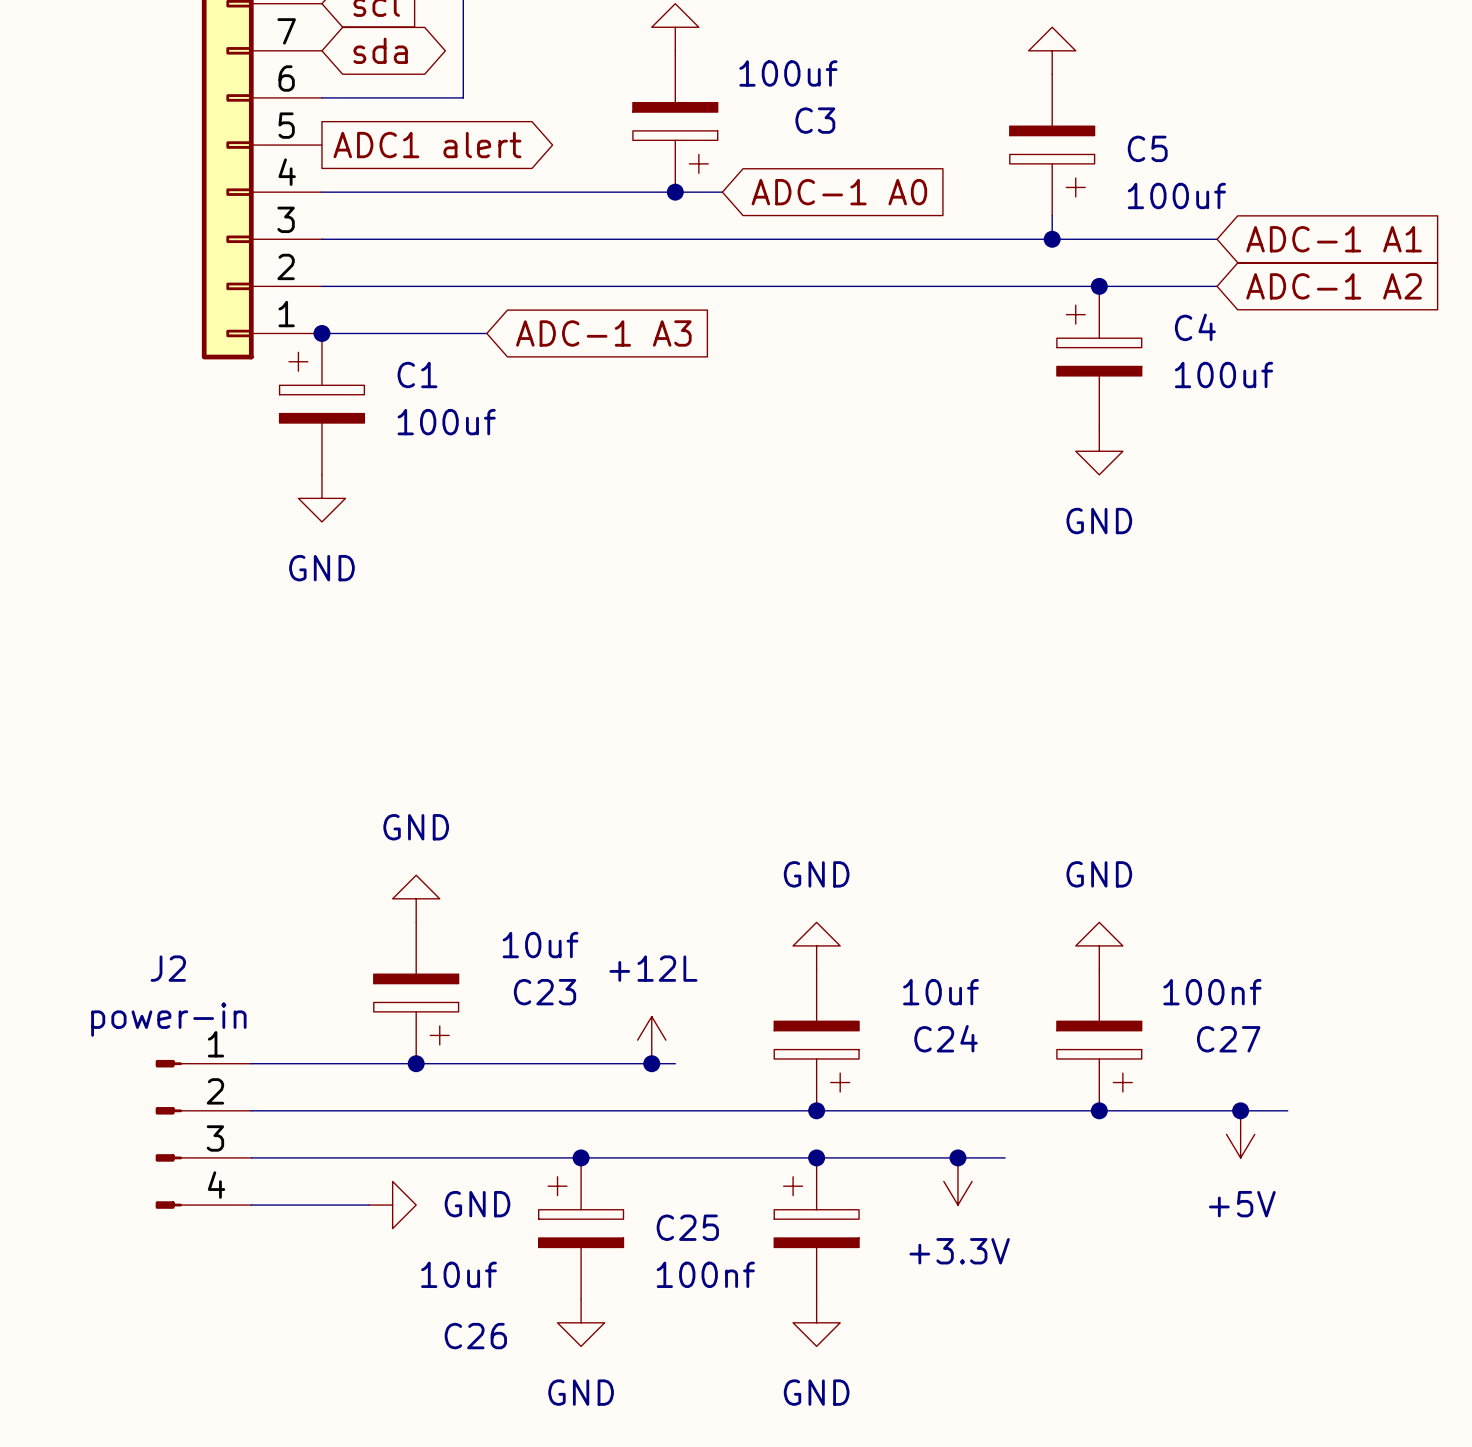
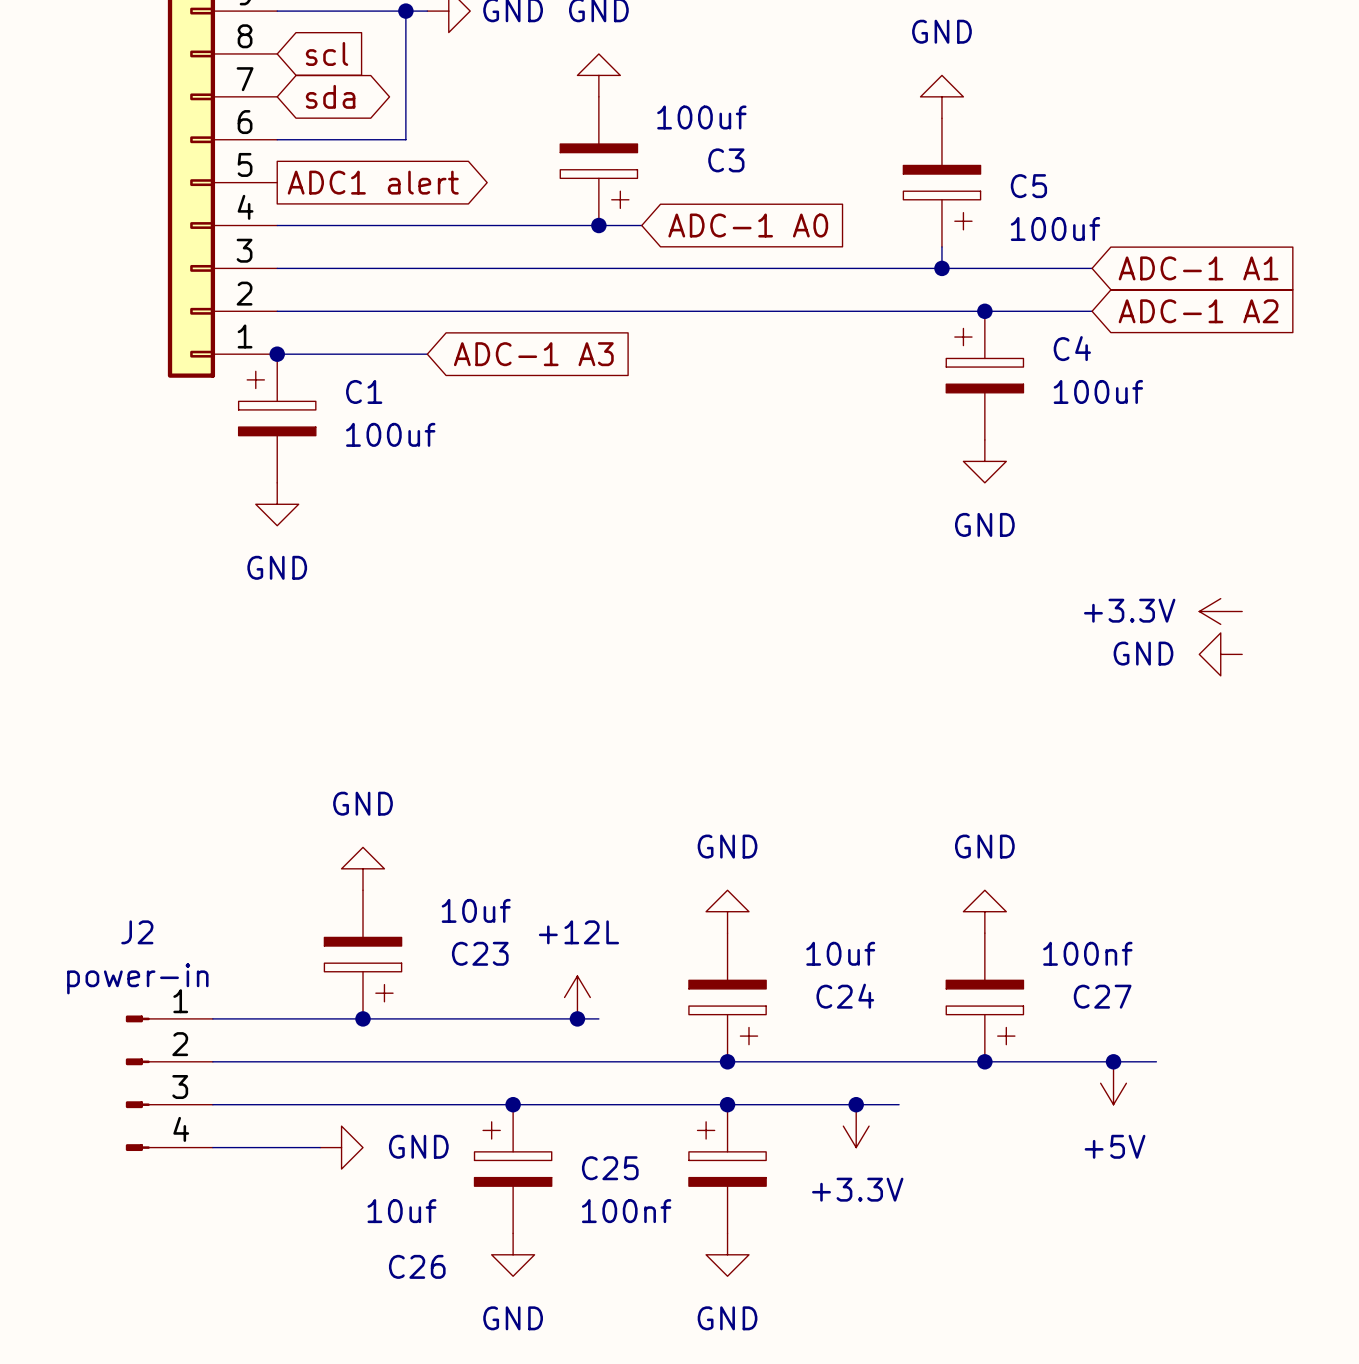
power symbol: none -> +3.3V (1220, 611)
power symbol: none -> GND (1220, 654)

